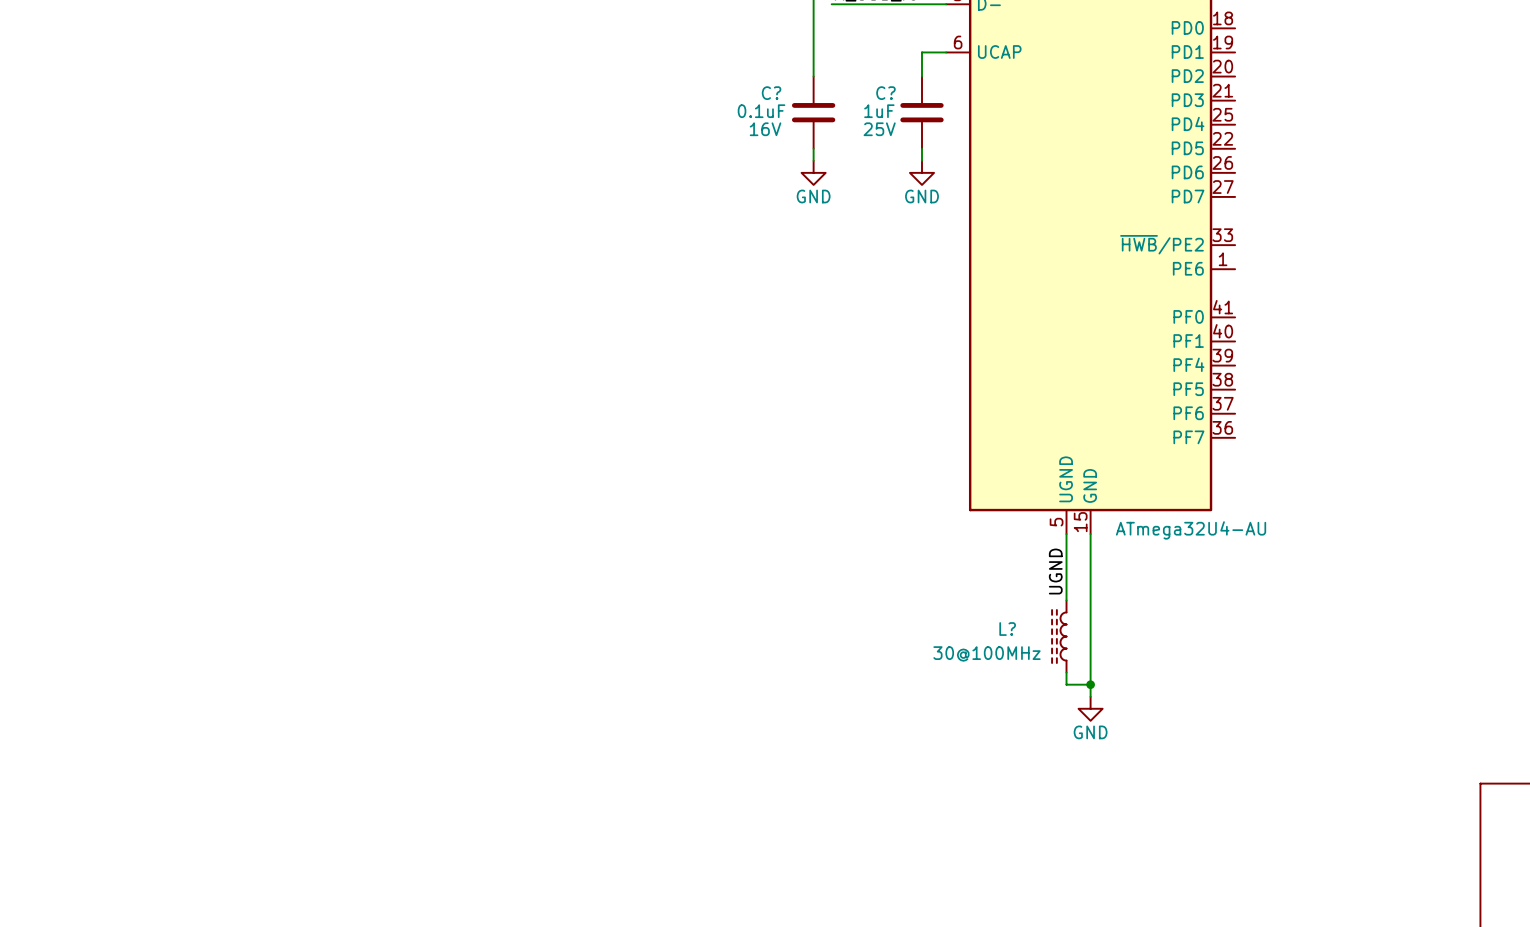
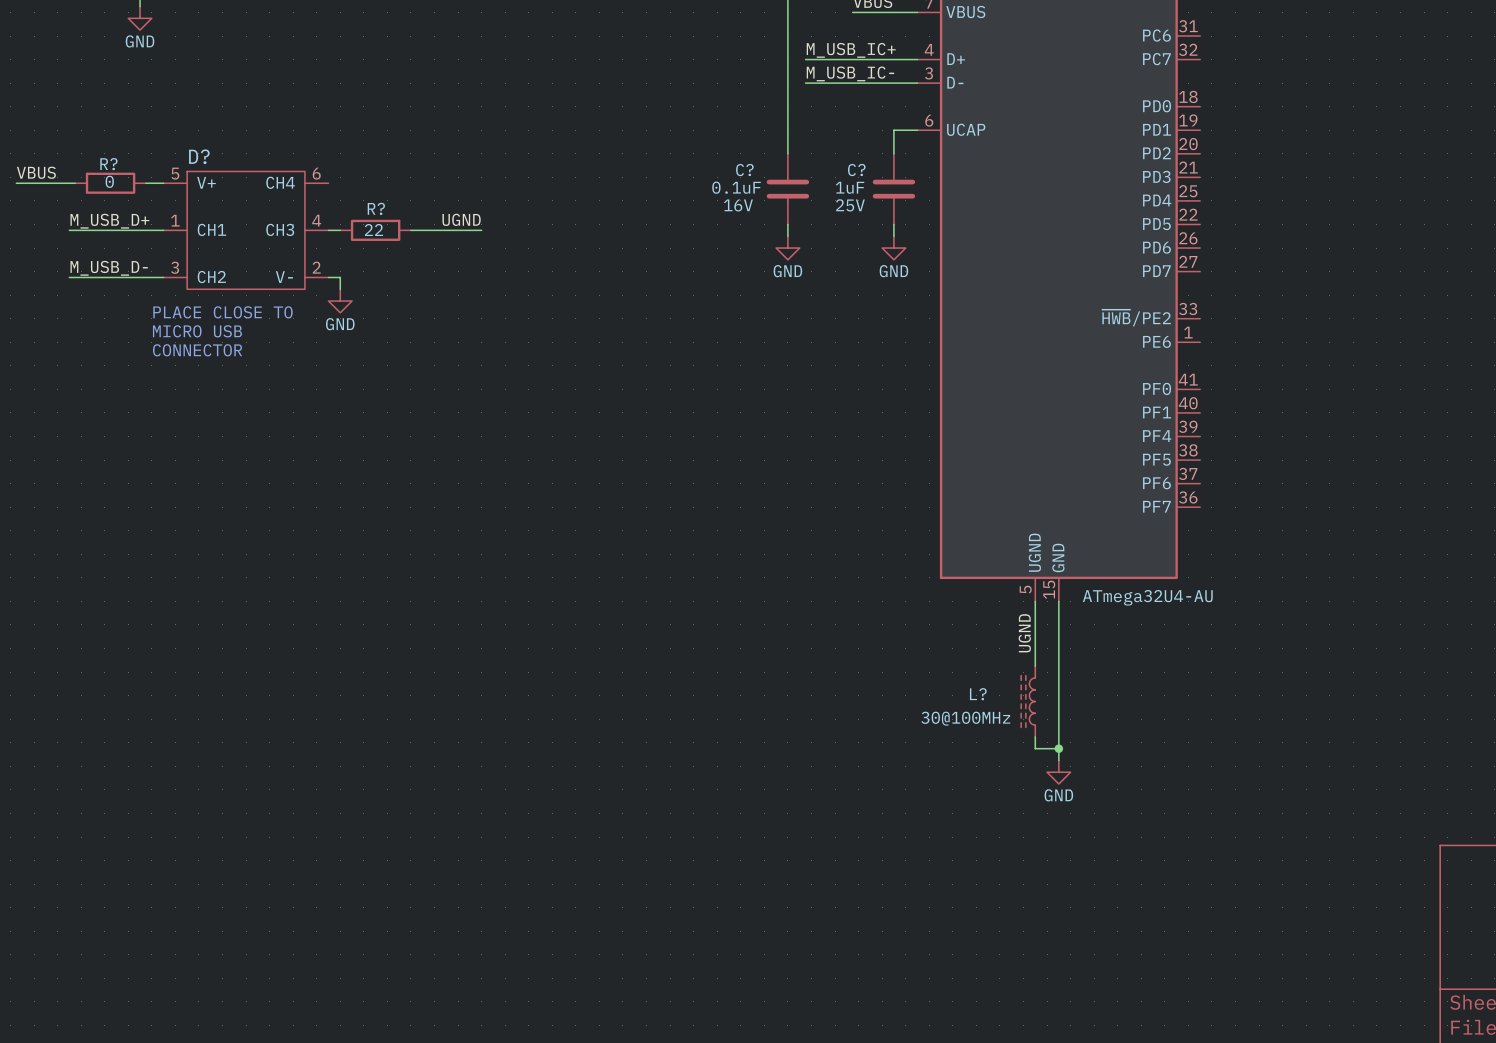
label: none -> VBUS (36, 172)
wire: none -> (16, 183) (75, 183)
R?: none -> (110, 183)
wire: none -> (145, 183) (163, 183)
label: none -> M_USB_D+ (109, 221)
label: none -> UGND (461, 219)
wire: none -> (69, 230) (163, 230)
D?: none -> (246, 230)
wire: none -> (328, 230) (340, 230)
R?: none -> (375, 230)
wire: none -> (410, 230) (481, 230)
label: none -> M_USB_D- (109, 268)
wire: none -> (69, 277) (163, 277)
wire: none -> (328, 277) (340, 277) (340, 289)
power symbol: none -> GND (340, 301)
text: none -> PLACE CLOSE TO (222, 312)
text: none -> MICRO USB (197, 331)
text: none -> CONNECTOR (197, 350)

